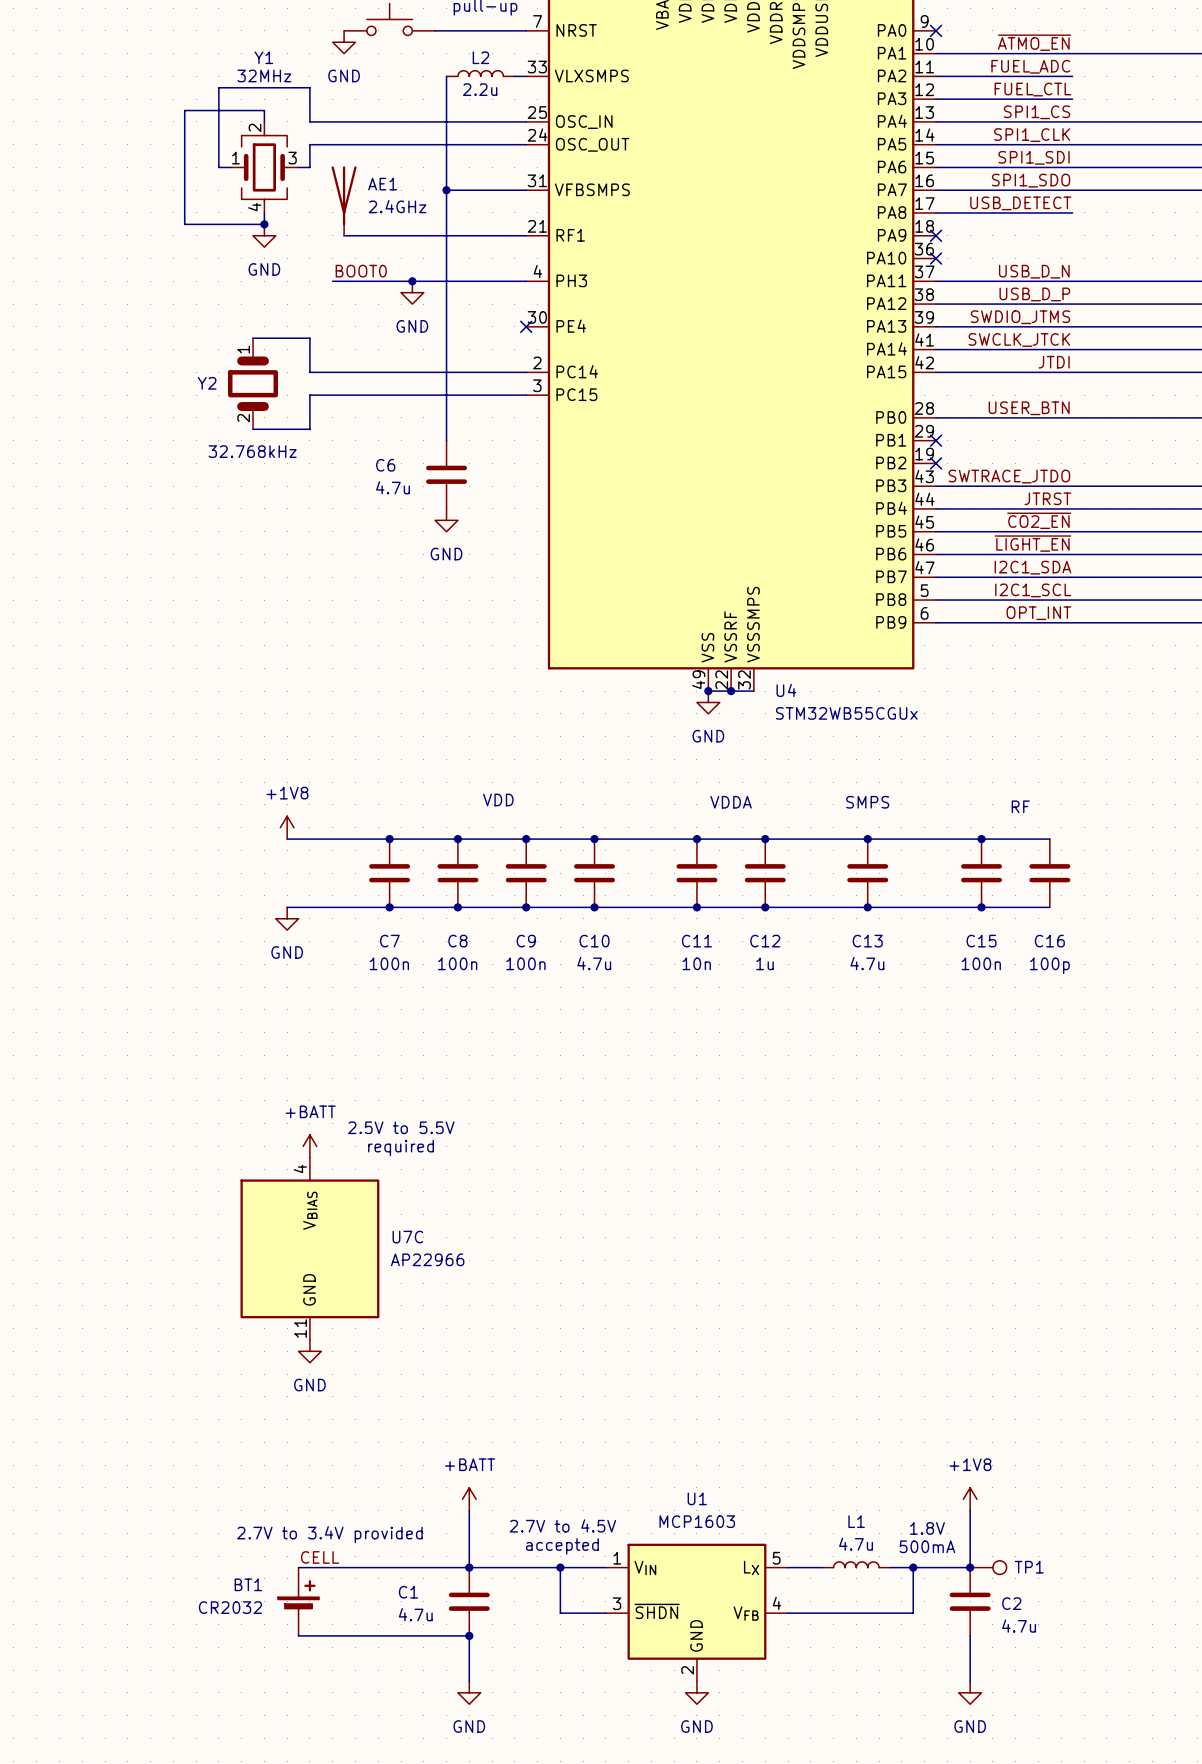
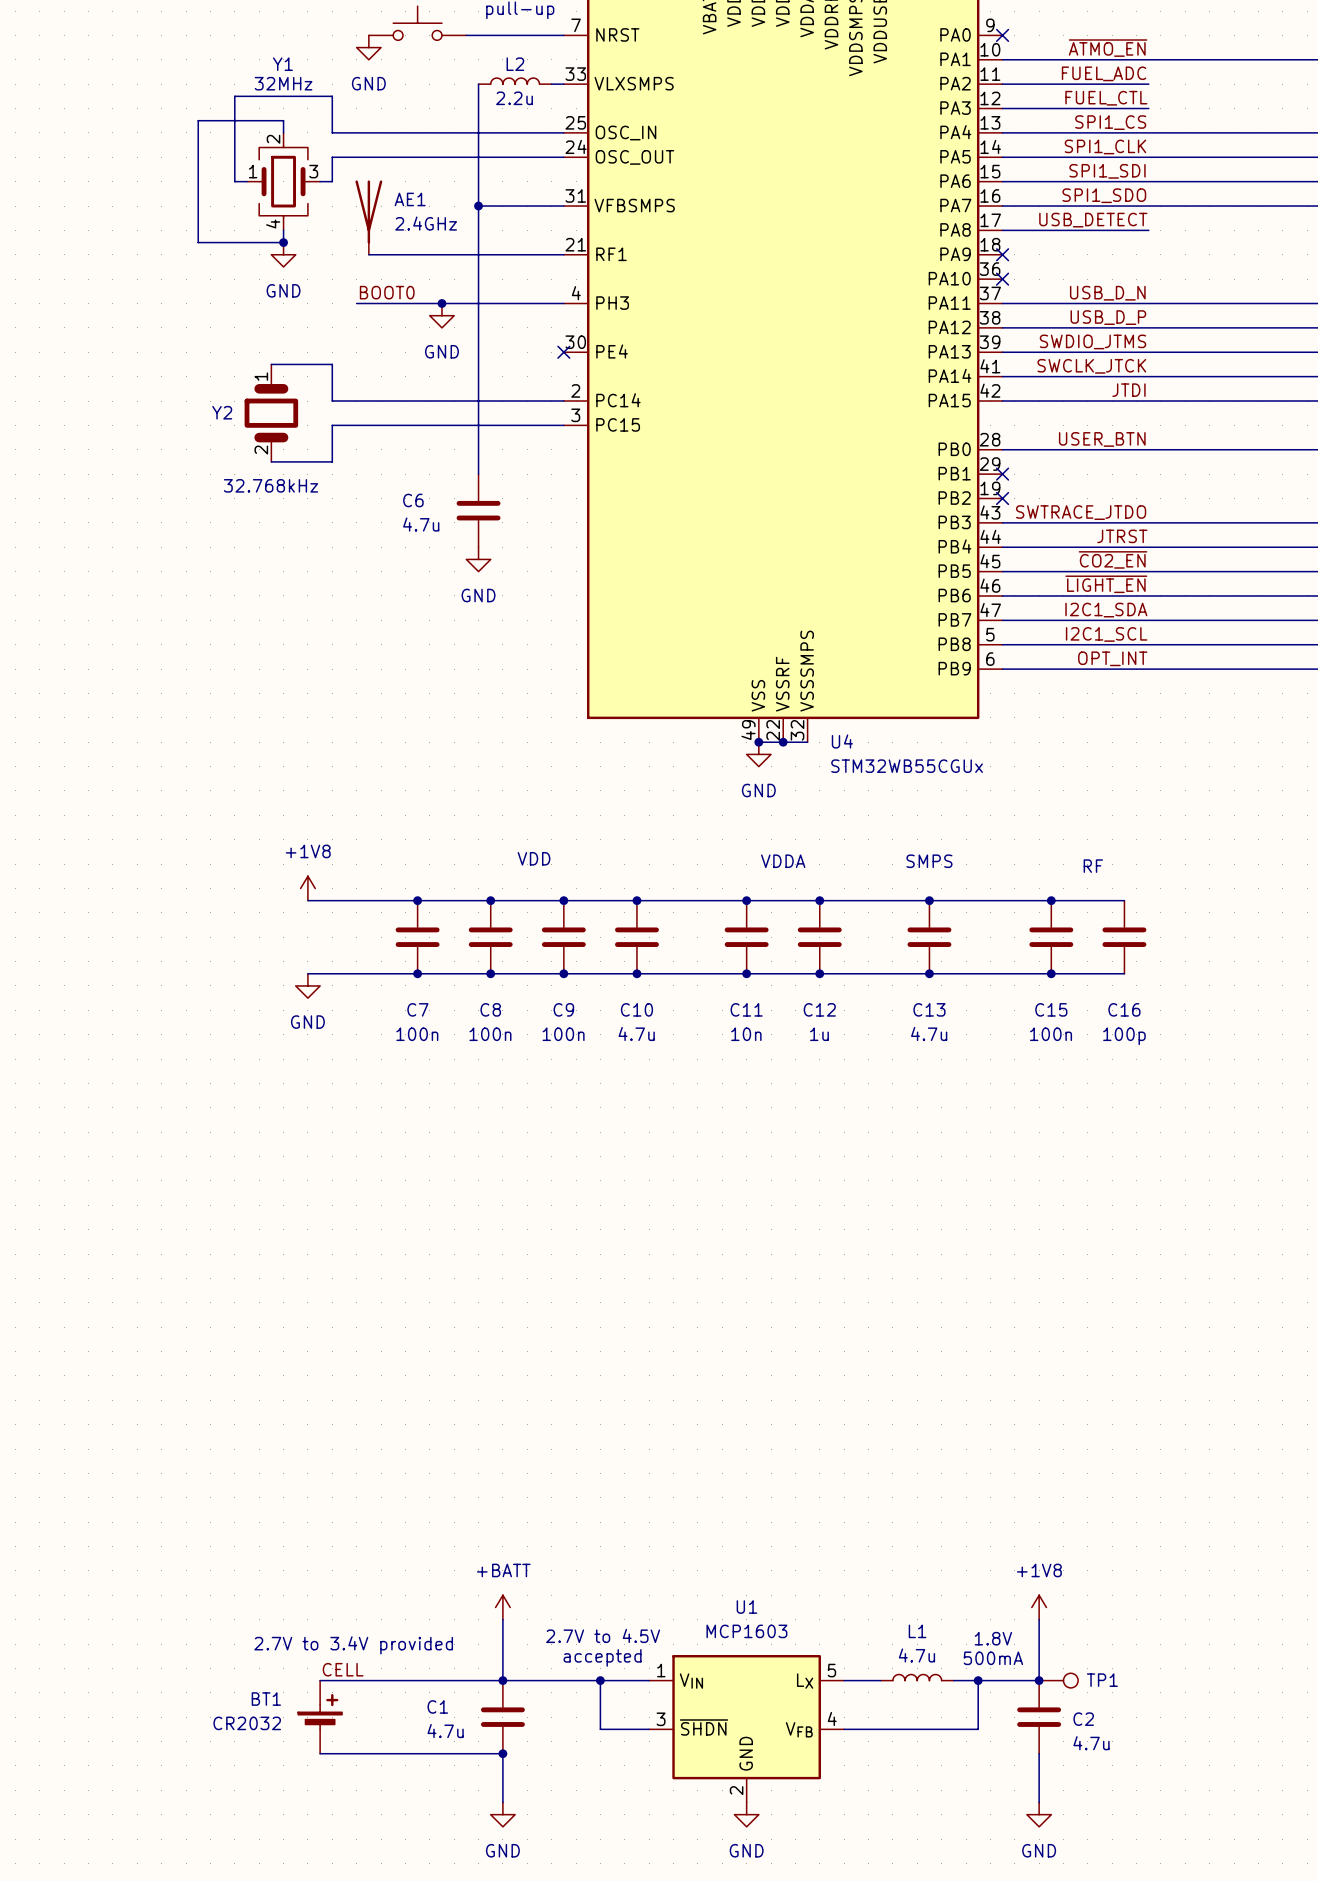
text: 2.5V to 5.5V (401, 1127) -> none
power symbol: +BATT (309, 1146) -> none
text: required (401, 1147) -> none
U7C: AP22966 (309, 1248) -> none
power symbol: GND (309, 1351) -> none

